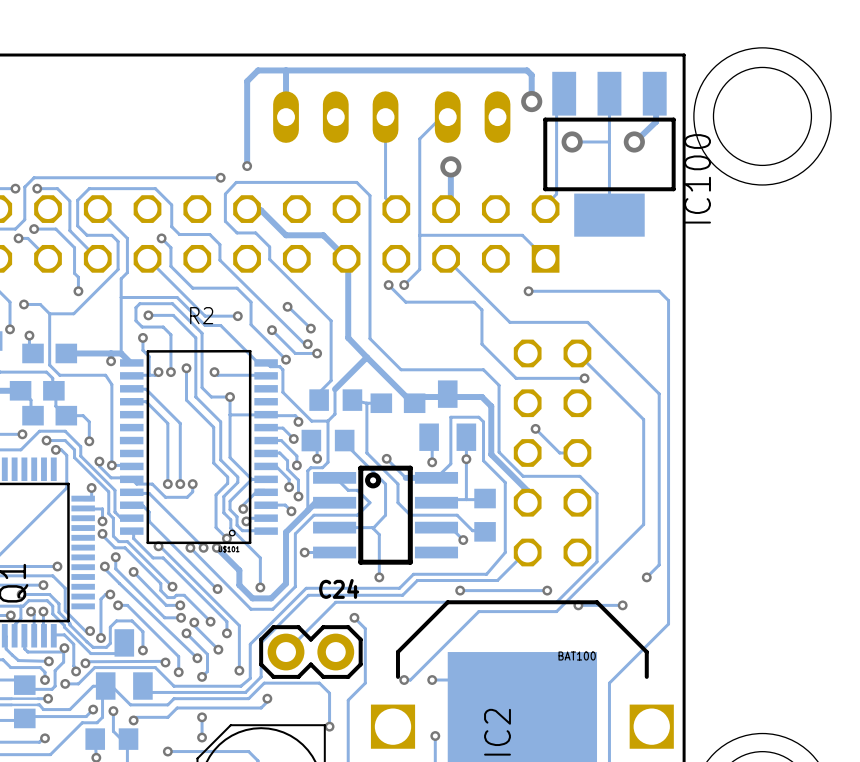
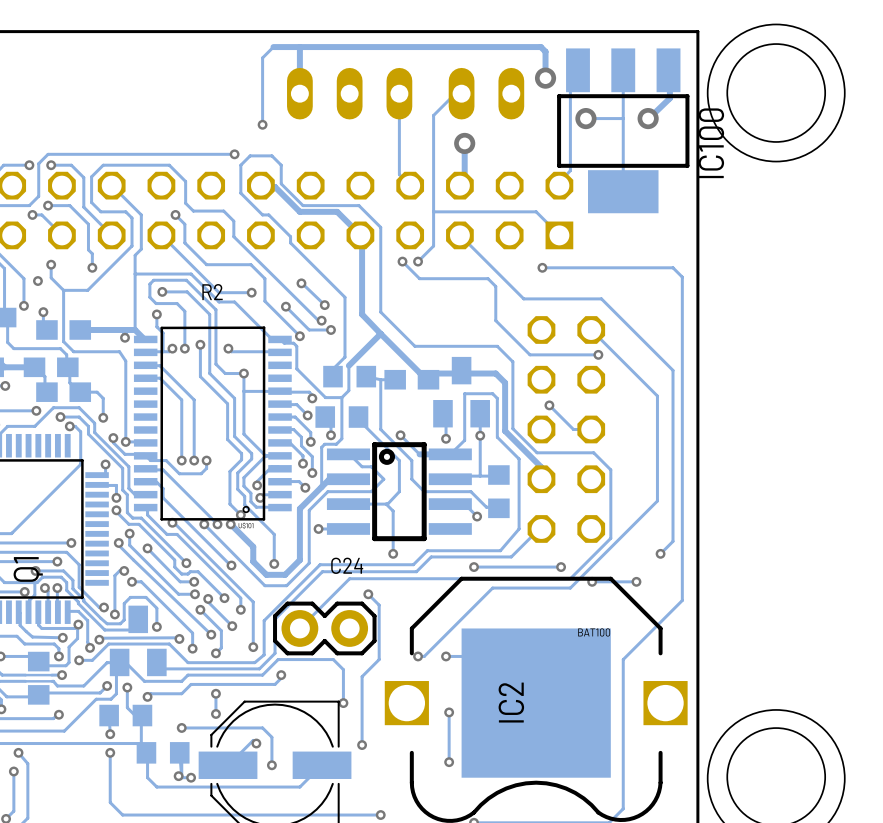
track: (259, 70) (247, 81) (247, 166) -> (273, 47) (262, 57) (262, 124)
via position: (247, 166) -> (262, 124)
track: (276, 266) (269, 259) (269, 246) (255, 232) (237, 232) (225, 221) (225, 194) (236, 182) (356, 182) (369, 195) (369, 338) -> (290, 242) (290, 236) (268, 214) (262, 214) (240, 193) (240, 165) (250, 155) (271, 155) (281, 165) (281, 183) (303, 205) (358, 205) (380, 227) (380, 312) (383, 315)
via: none -> (51, 264)
track: (40, 304) (24, 304) -> (54, 281) (51, 277) (51, 264)

